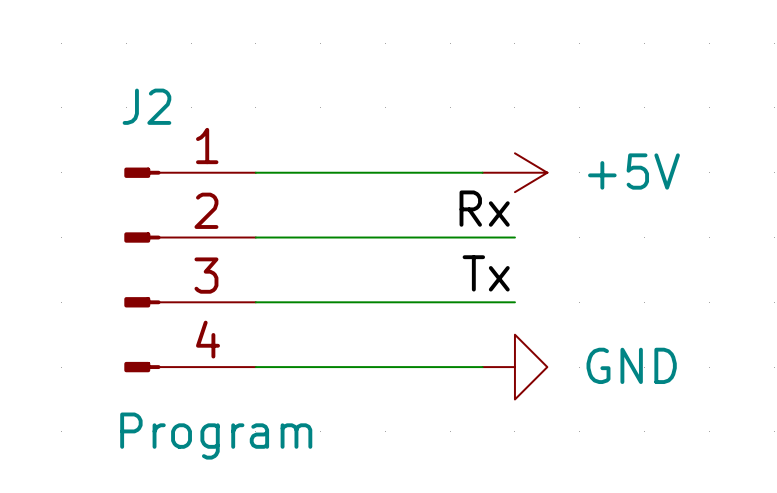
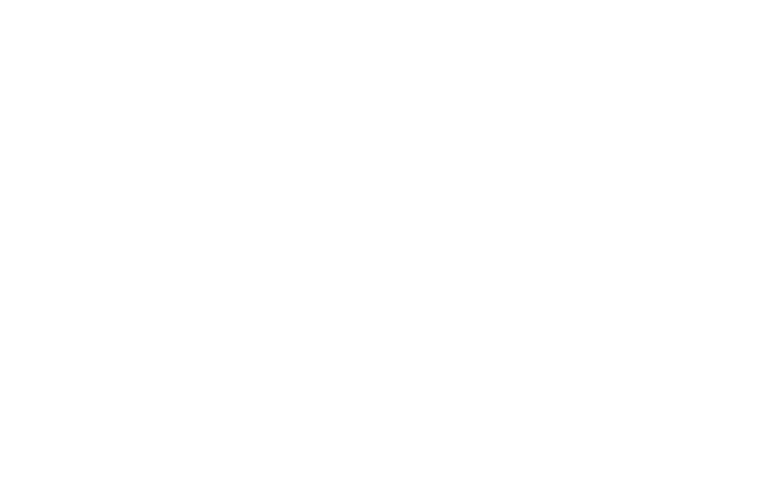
wire: (255, 172) (482, 172) -> none
power symbol: +5V (514, 172) -> none
label: Rx (484, 208) -> none
wire: (255, 237) (514, 237) -> none
J2: Program (190, 269) -> none
label: Tx (486, 273) -> none
wire: (255, 302) (514, 302) -> none
wire: (255, 367) (482, 367) -> none
power symbol: GND (514, 367) -> none

